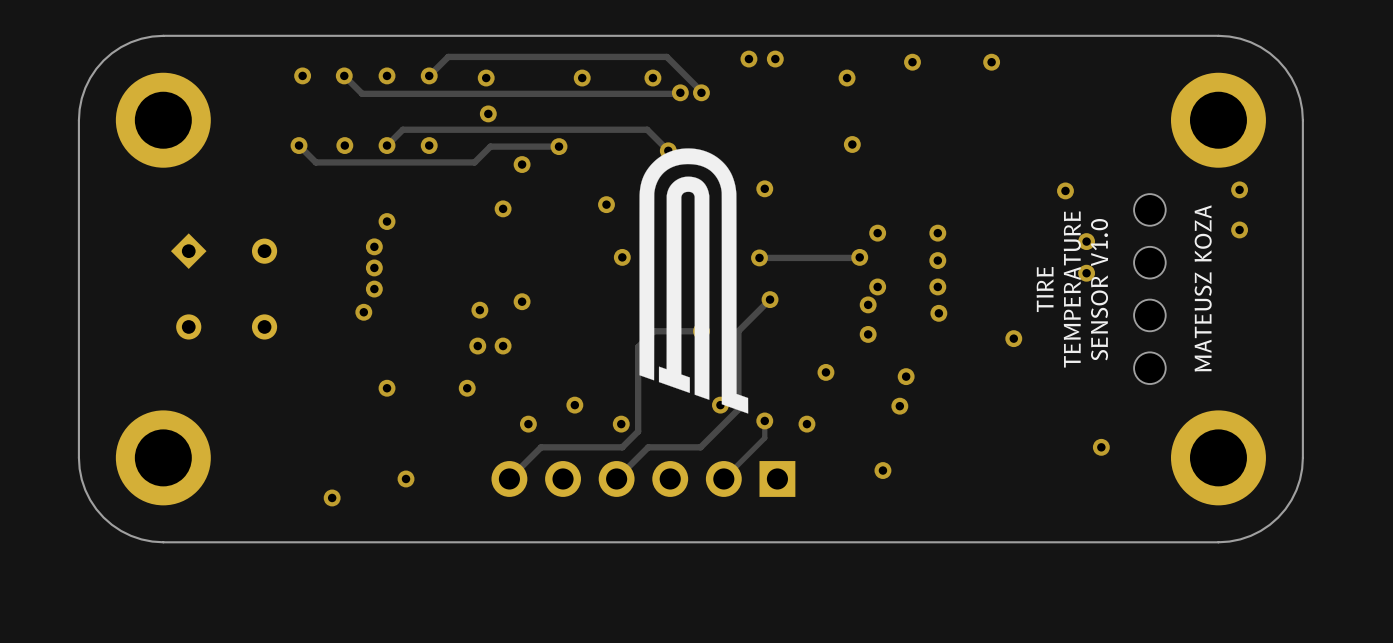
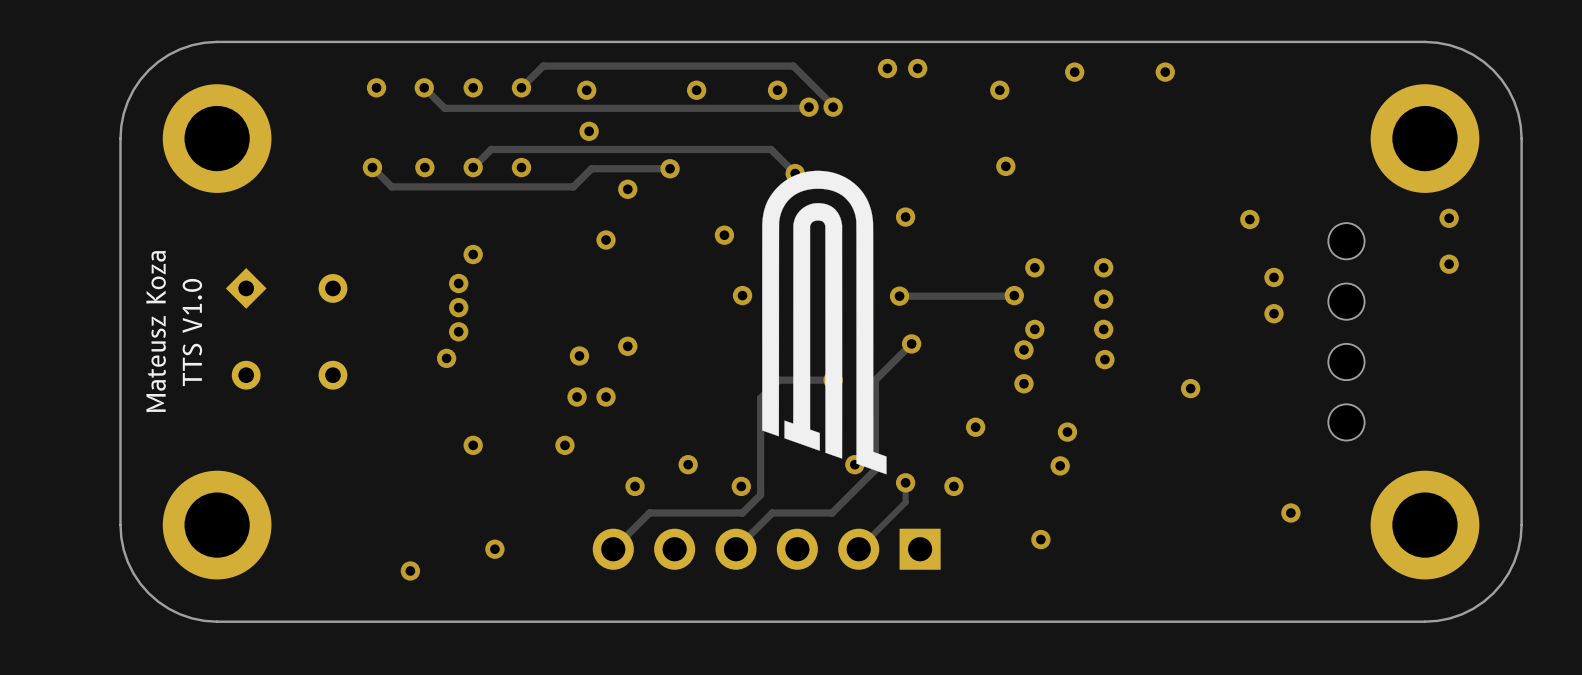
text: none -> Mateusz Koza (156, 331)
text: MATEUSZ KOZA (1203, 288) -> none
text: none -> TTS V1.0 (192, 332)
text: TIRE (1045, 289) -> none
text: TEMPERATURE (1072, 289) -> none
text: SENSOR V1.0 (1099, 289) -> none

